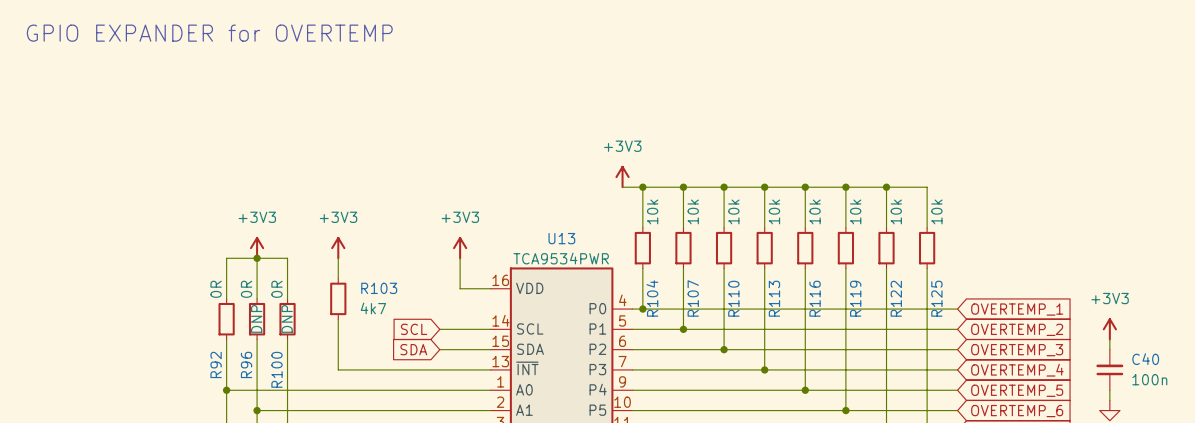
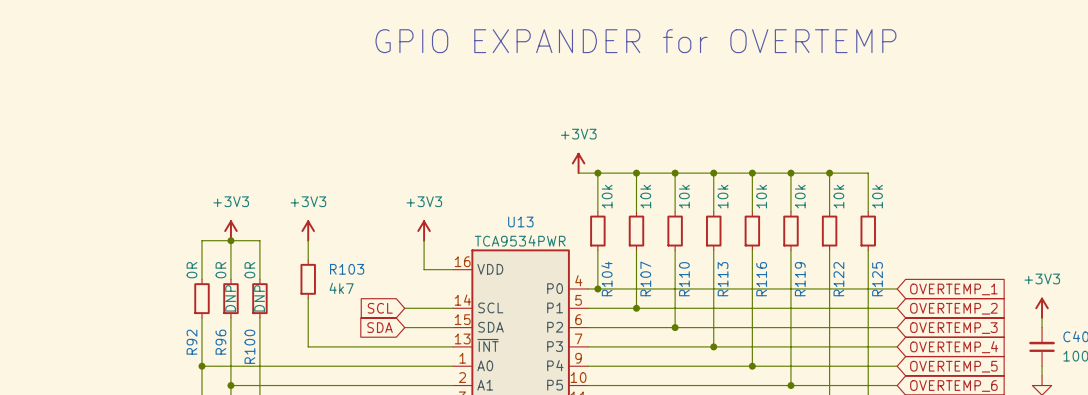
text: GPIO EXPANDER for OVERTEMP (209, 33) -> none
text: none -> GPIO EXPANDER for OVERTEMP (635, 41)

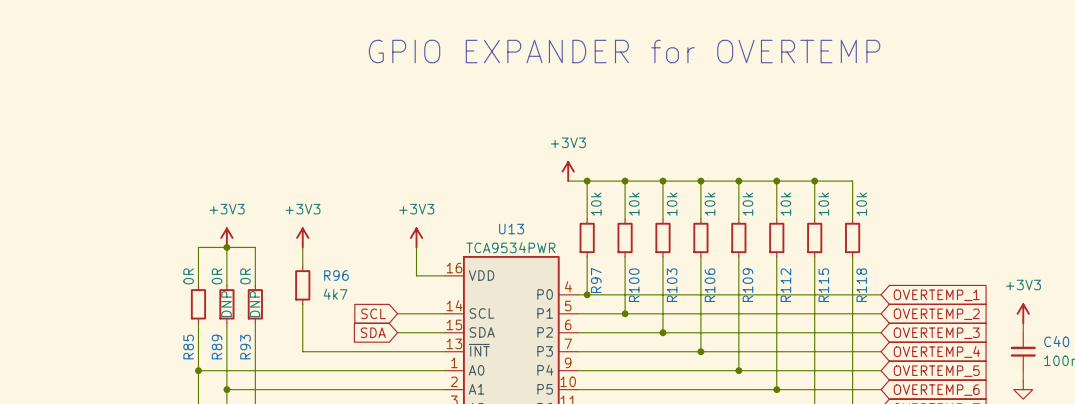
R103 name: R103 (347, 269) -> R96 (336, 275)
R104 name: R104 (606, 278) -> R97 (596, 280)
R107 name: R107 (645, 278) -> R100 (634, 285)
R110 name: R110 (684, 279) -> R103 (672, 285)
R113 name: R113 (723, 279) -> R106 (710, 285)
R116 name: R116 (761, 279) -> R109 (747, 285)
R119 name: R119 (800, 279) -> R112 (785, 285)
R122 name: R122 (838, 279) -> R115 (823, 285)
R125 name: R125 (877, 279) -> R118 (861, 285)
R92 name: R92 (191, 342) -> R85 (188, 347)
R96 name: R96 (220, 342) -> R89 (217, 347)
R100 name: R100 (249, 346) -> R93 (245, 347)

